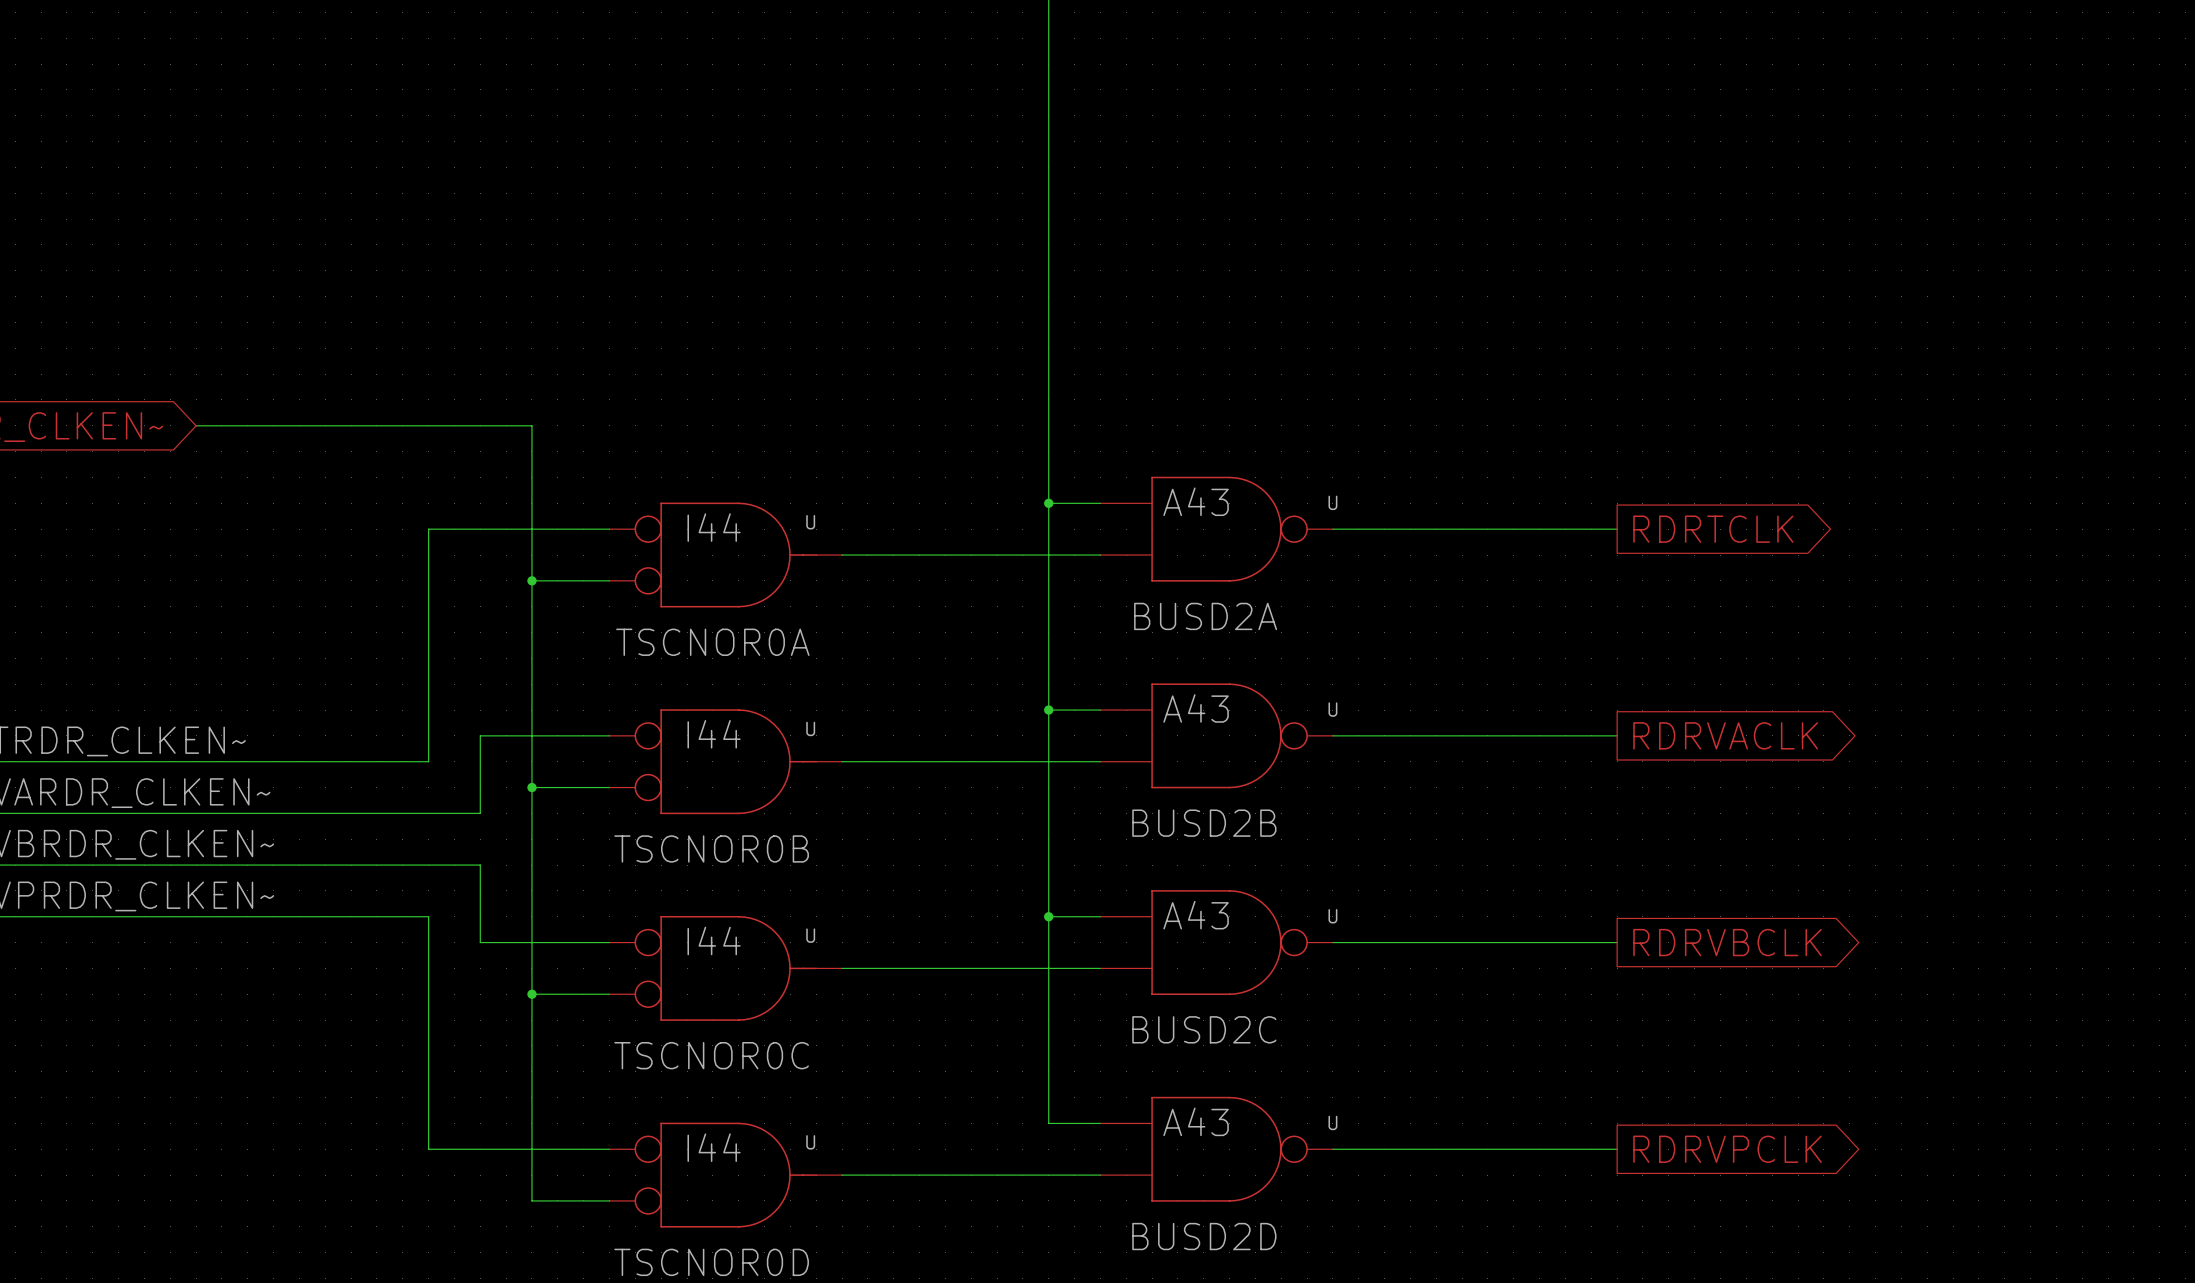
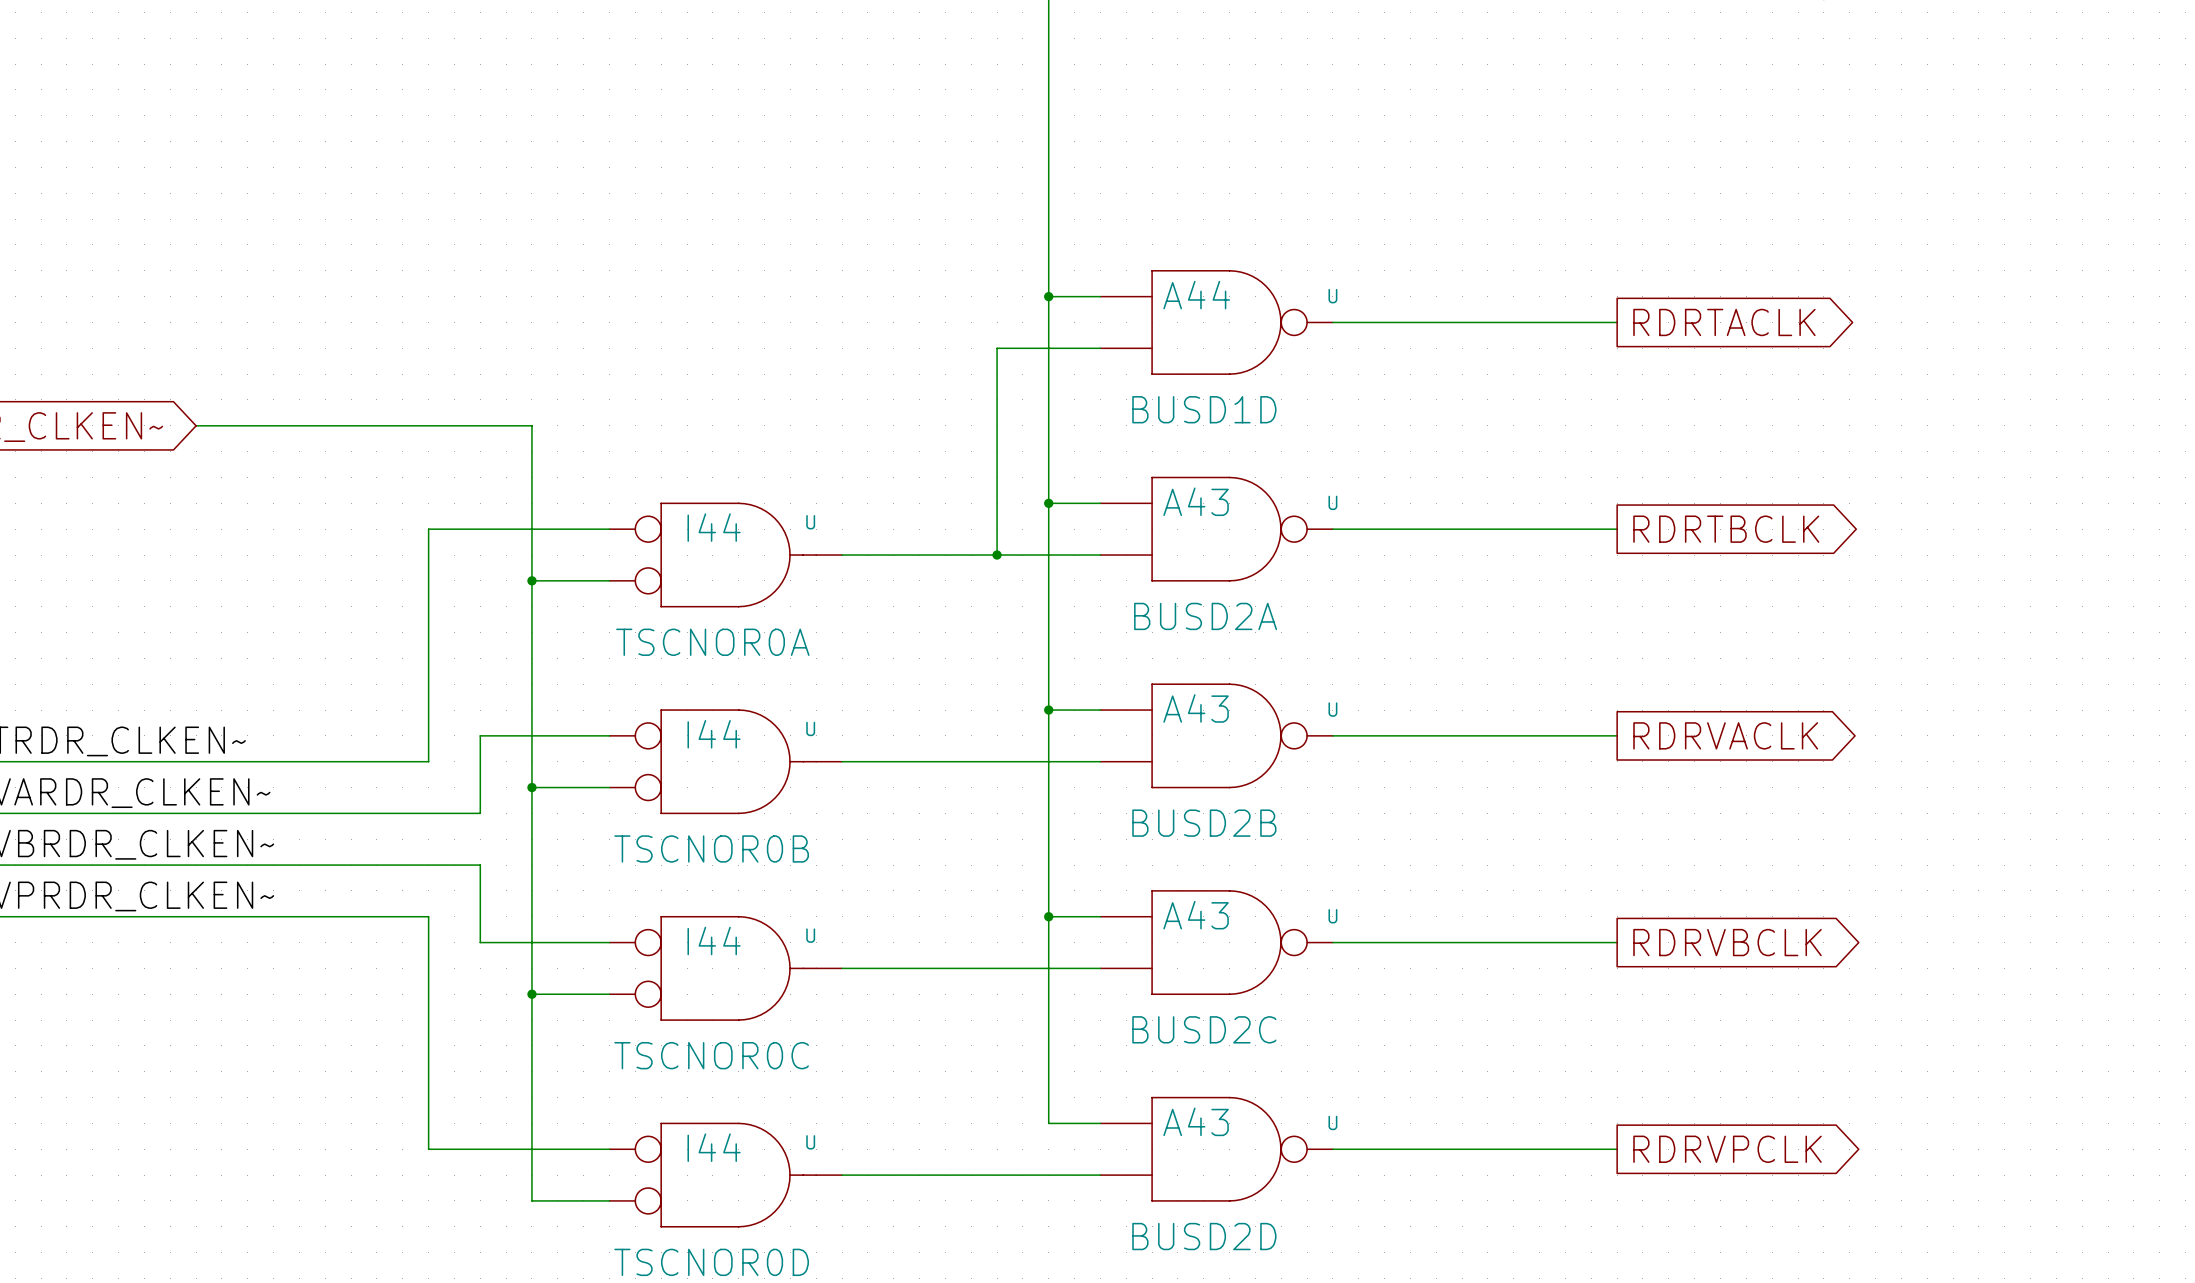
wire: none -> (1048, 296) (1100, 296)
junction: none -> (1048, 296)
U: none -> (1216, 322)
wire: none -> (1332, 322) (1617, 322)
global label: none -> RDRTACLK (1724, 322)
wire: none -> (1100, 348) (997, 348) (997, 555)
global label: RDRTCLK (1713, 529) -> RDRTBCLK (1726, 529)
junction: none -> (997, 555)

